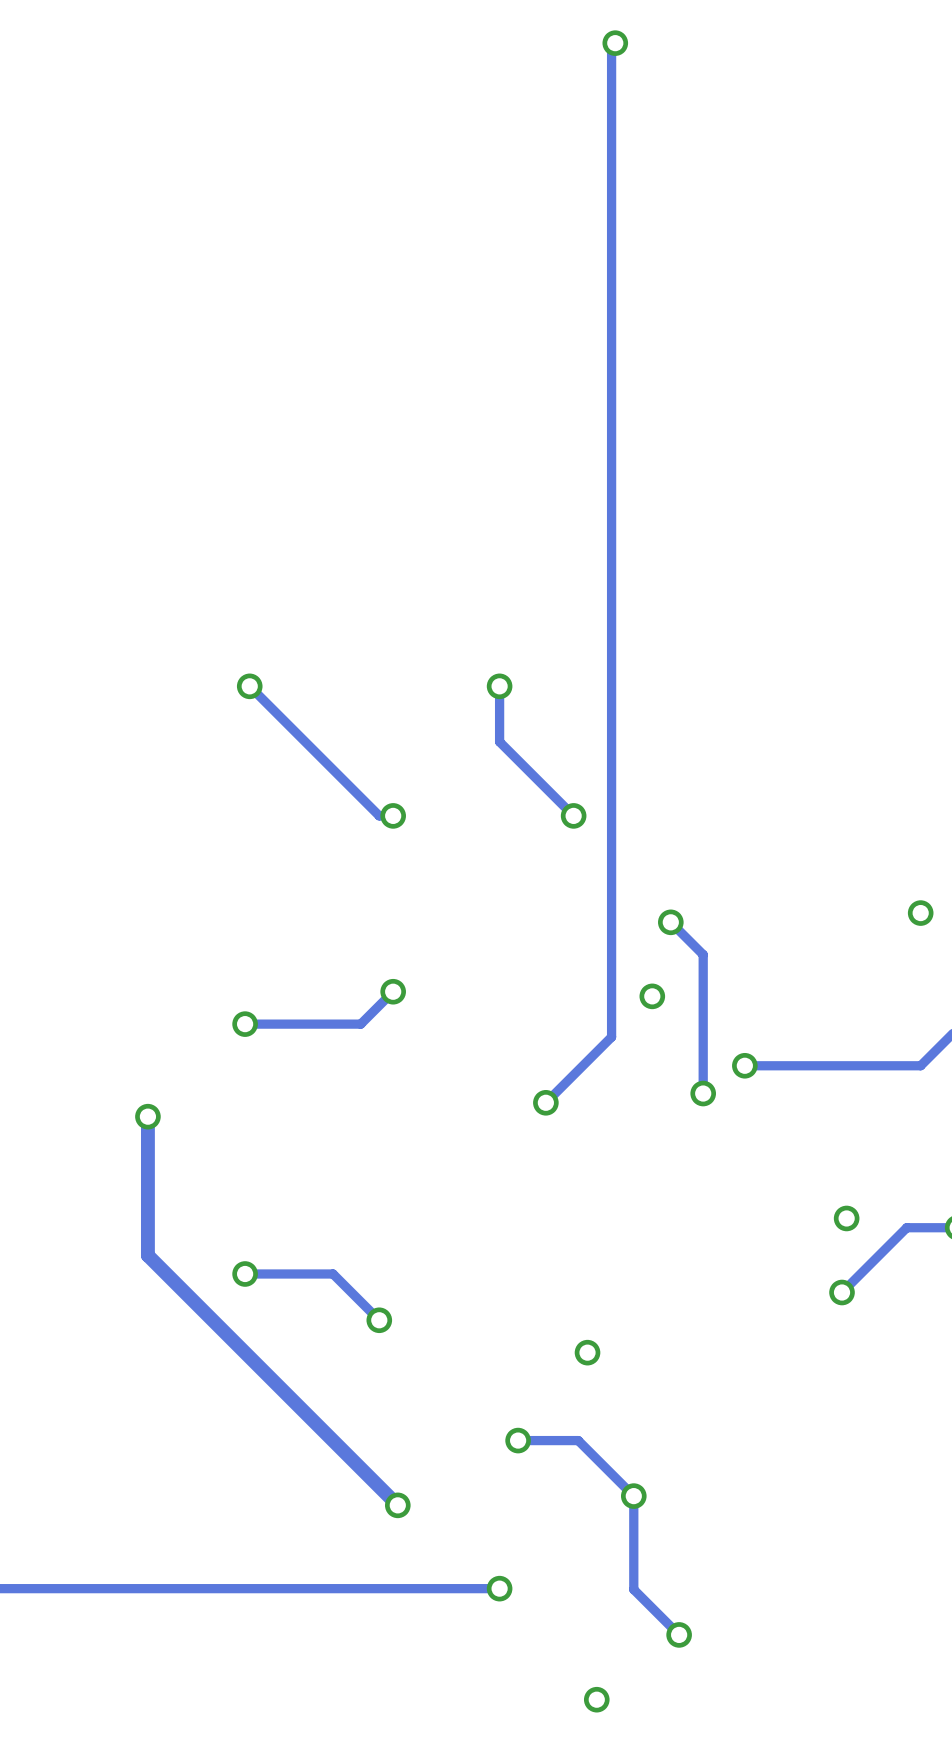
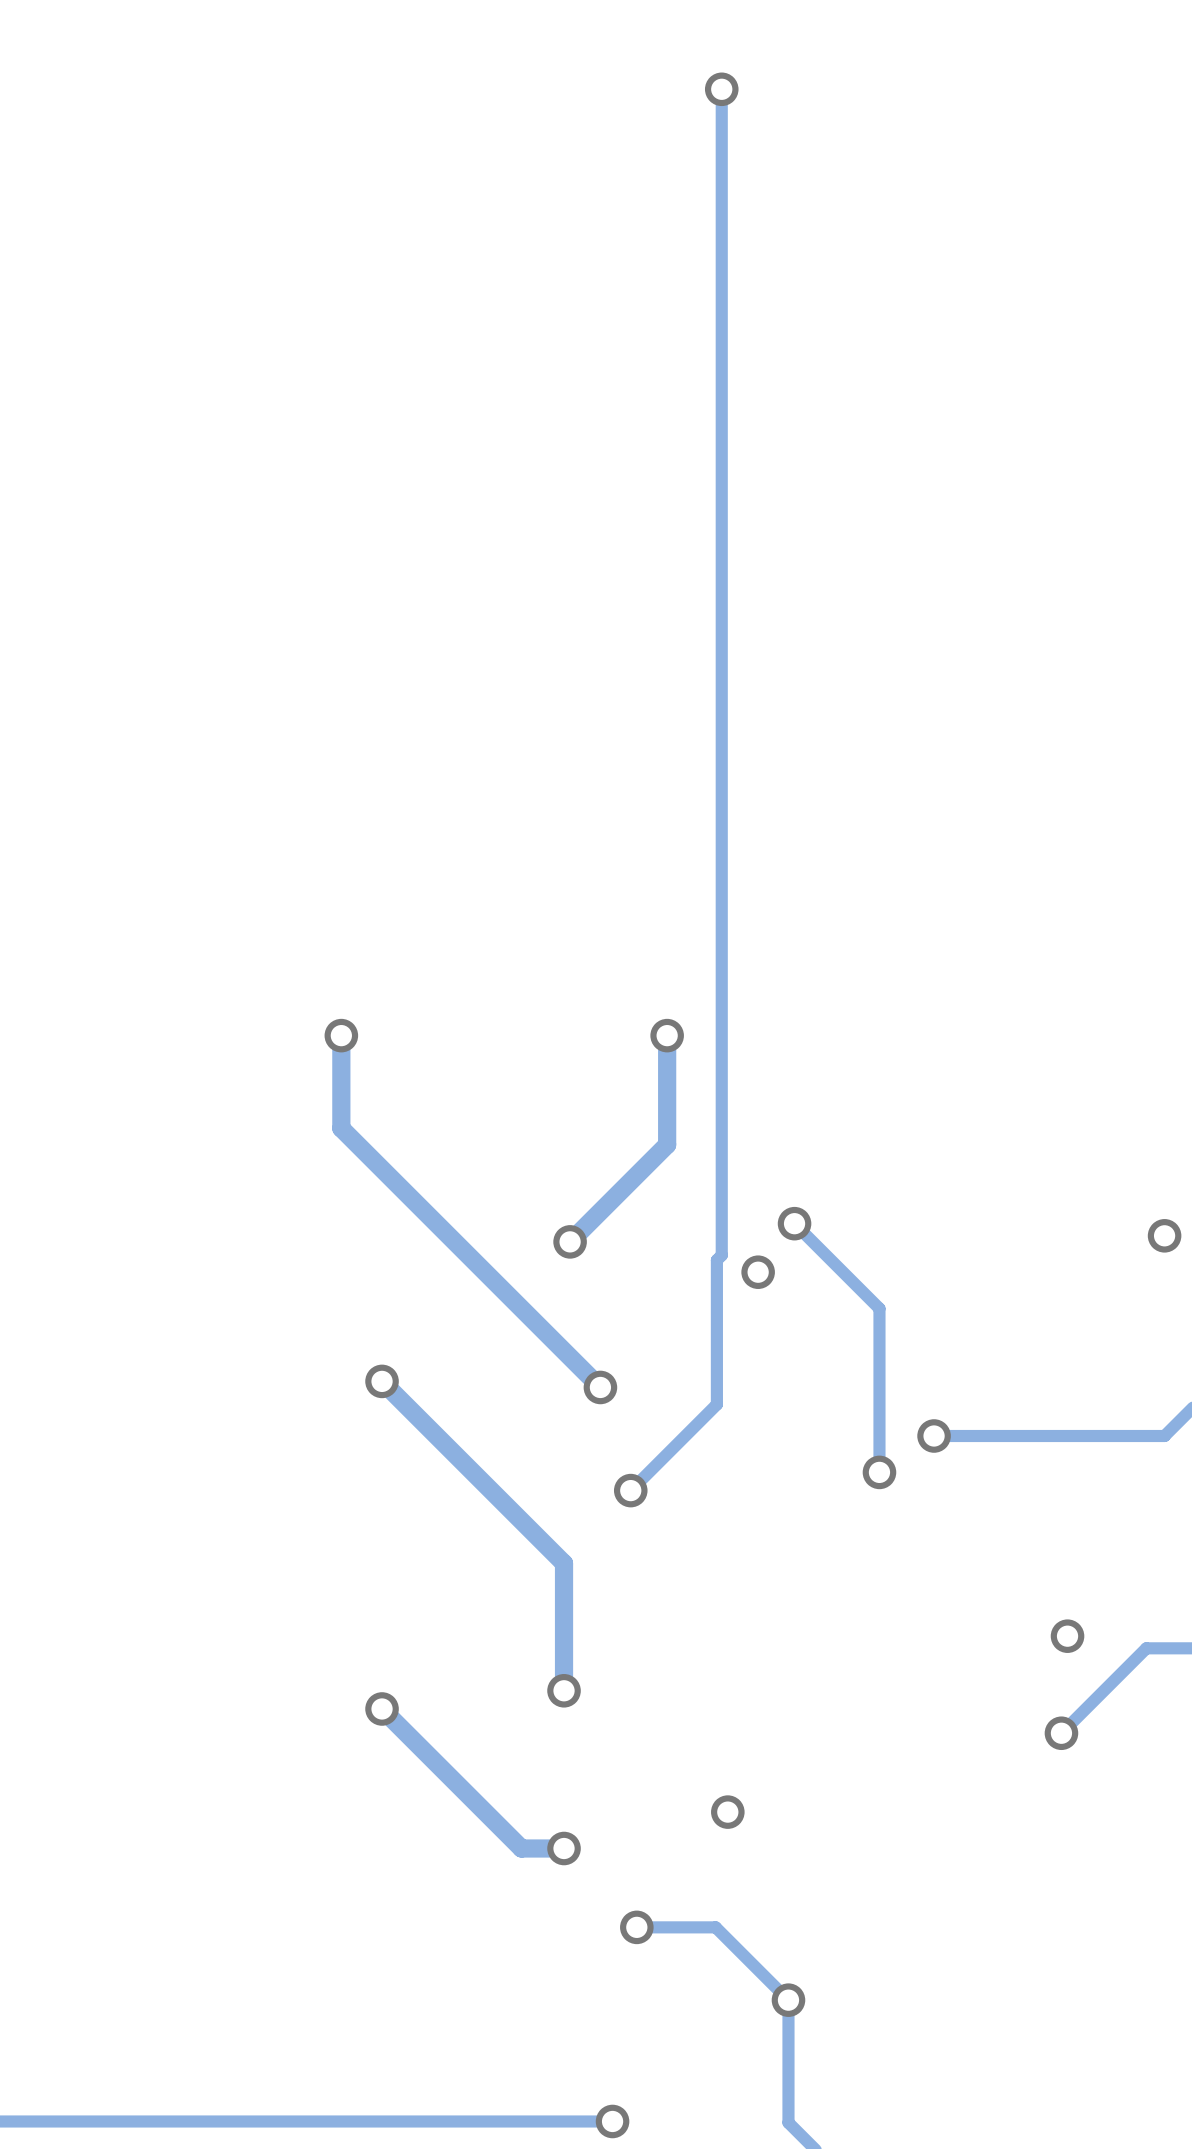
track: none -> (721, 89) (721, 1255) (716, 1260) (716, 1404) (630, 1490)
track: (615, 43) (611, 46) (611, 1037) (545, 1102) -> none
via position: (615, 43) -> (721, 89)
track: (249, 686) (379, 815) (393, 815) -> none
via: (249, 686) -> none
track: (499, 686) (499, 741) (573, 815) -> none
via: (499, 686) -> none
track: none -> (341, 1035) (341, 1128) (600, 1387)
via: none -> (341, 1035)
track: none -> (667, 1035) (667, 1144) (570, 1241)
via: none -> (667, 1035)
via: (393, 815) -> none
via: (573, 815) -> none
via: none -> (794, 1223)
via: none -> (570, 1241)
track: (670, 922) (703, 954) (703, 968) -> (794, 1223) (879, 1308)
via: (670, 922) -> none
via: none -> (758, 1272)
track: (393, 991) (360, 1024) (245, 1024) -> none
via: (393, 991) -> none
via: (652, 996) -> none
via: (245, 1024) -> none
track: none -> (382, 1381) (564, 1563) (564, 1690)
via: none -> (382, 1381)
via: none -> (600, 1387)
via position: (545, 1102) -> (630, 1490)
track: (147, 1116) (147, 1255) (397, 1505) -> none
via: (147, 1116) -> none
via: none -> (564, 1690)
track: (245, 1273) (333, 1273) (379, 1320) -> none
via: (245, 1273) -> none
track: none -> (382, 1708) (521, 1848) (564, 1848)
via: none -> (382, 1708)
via: (379, 1320) -> none
via: none -> (564, 1848)
via: (397, 1505) -> none

